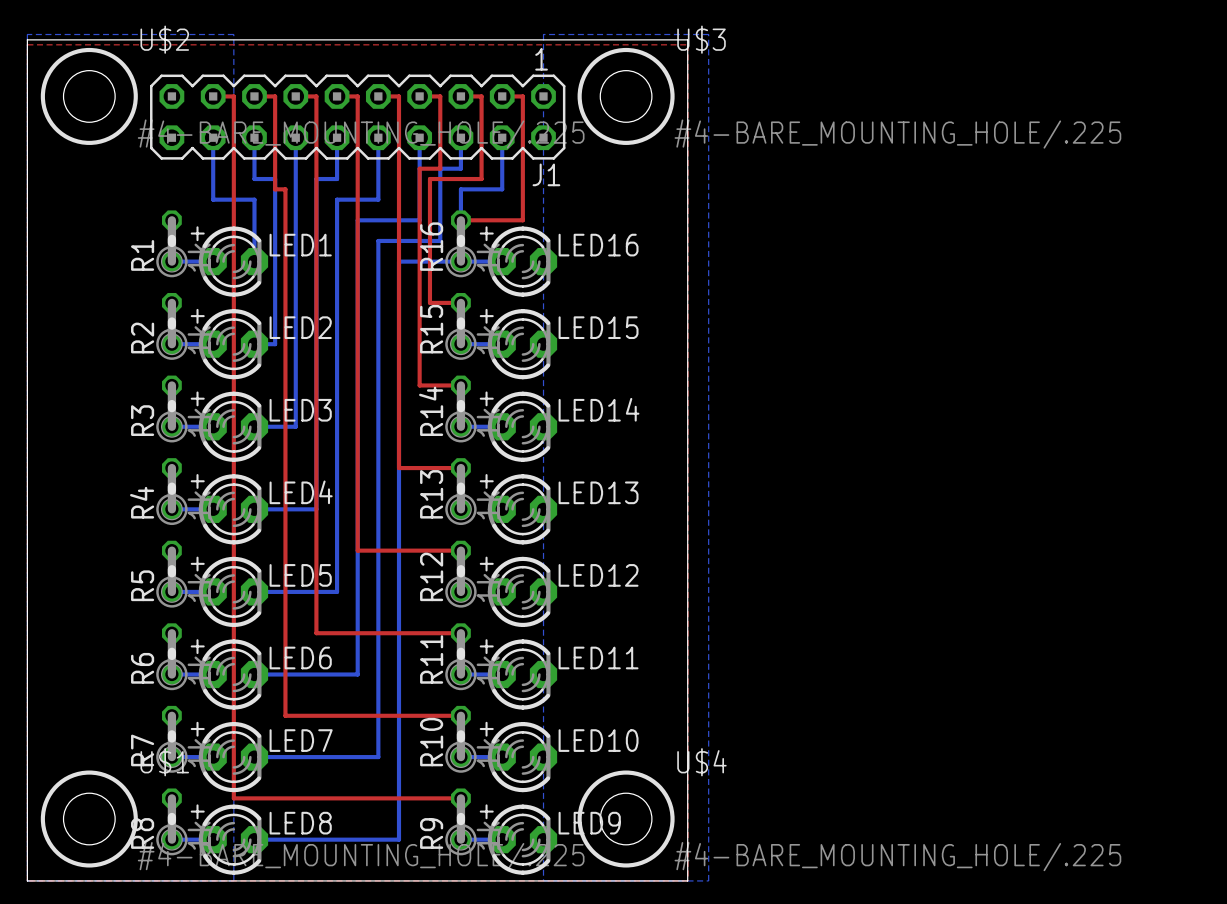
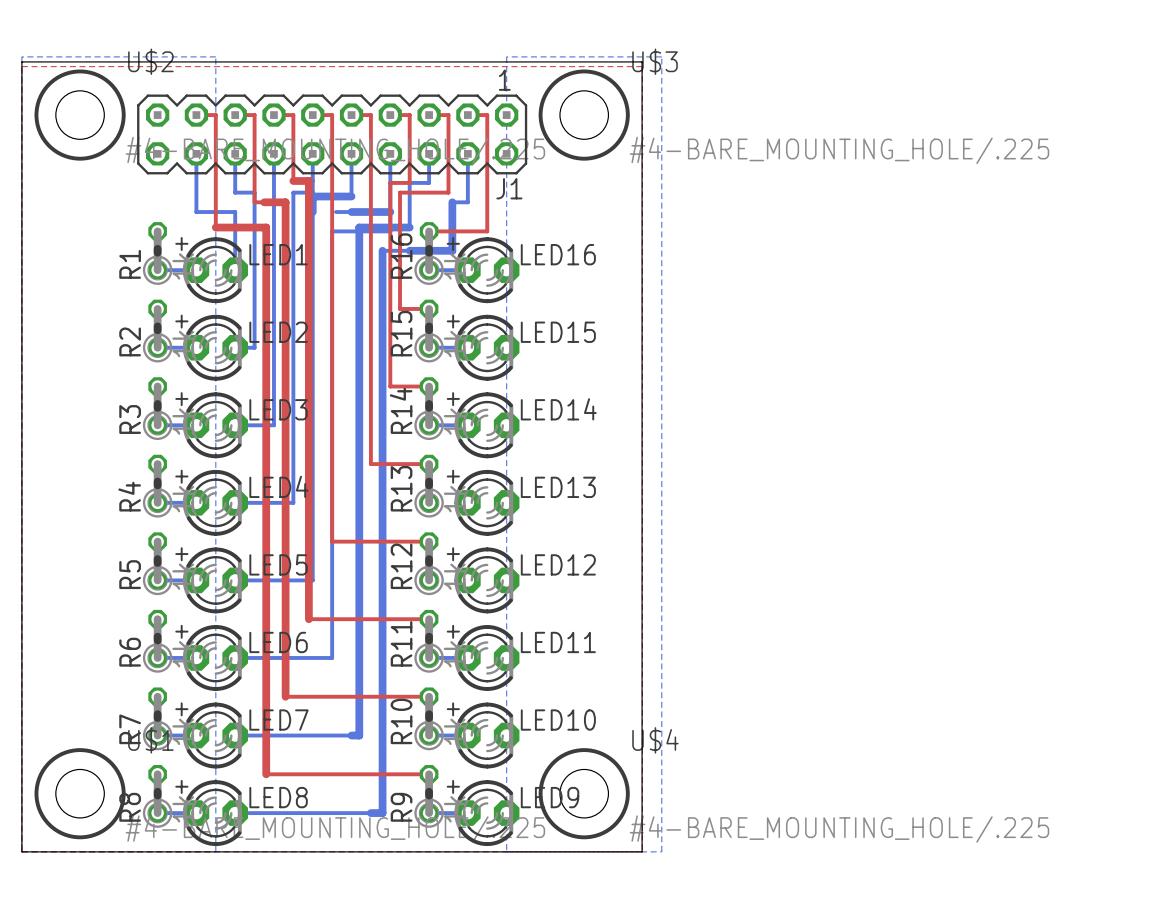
top track: (316, 166) (316, 633) (332, 633) -> (293, 180) (308, 180) (308, 619)
bottom track: (378, 183) (378, 199) -> (390, 212) (351, 212)
top track: (285, 189) (285, 715) (308, 715) -> (264, 202) (285, 202) (285, 696)
bottom track: (485, 189) (460, 189) (460, 261) (399, 261) (399, 839) -> (382, 250) (382, 813) (370, 813)
bottom track: (337, 199) (361, 199) -> (312, 212) (312, 196) (351, 196)
top track: (233, 216) (233, 798) (287, 798) -> (215, 227) (266, 227) (266, 774)
bottom track: (440, 216) (440, 240) -> (452, 202) (452, 250) (409, 250)
bottom track: (411, 240) (378, 240) (378, 757) -> (409, 227) (359, 227) (359, 735) (351, 735)

